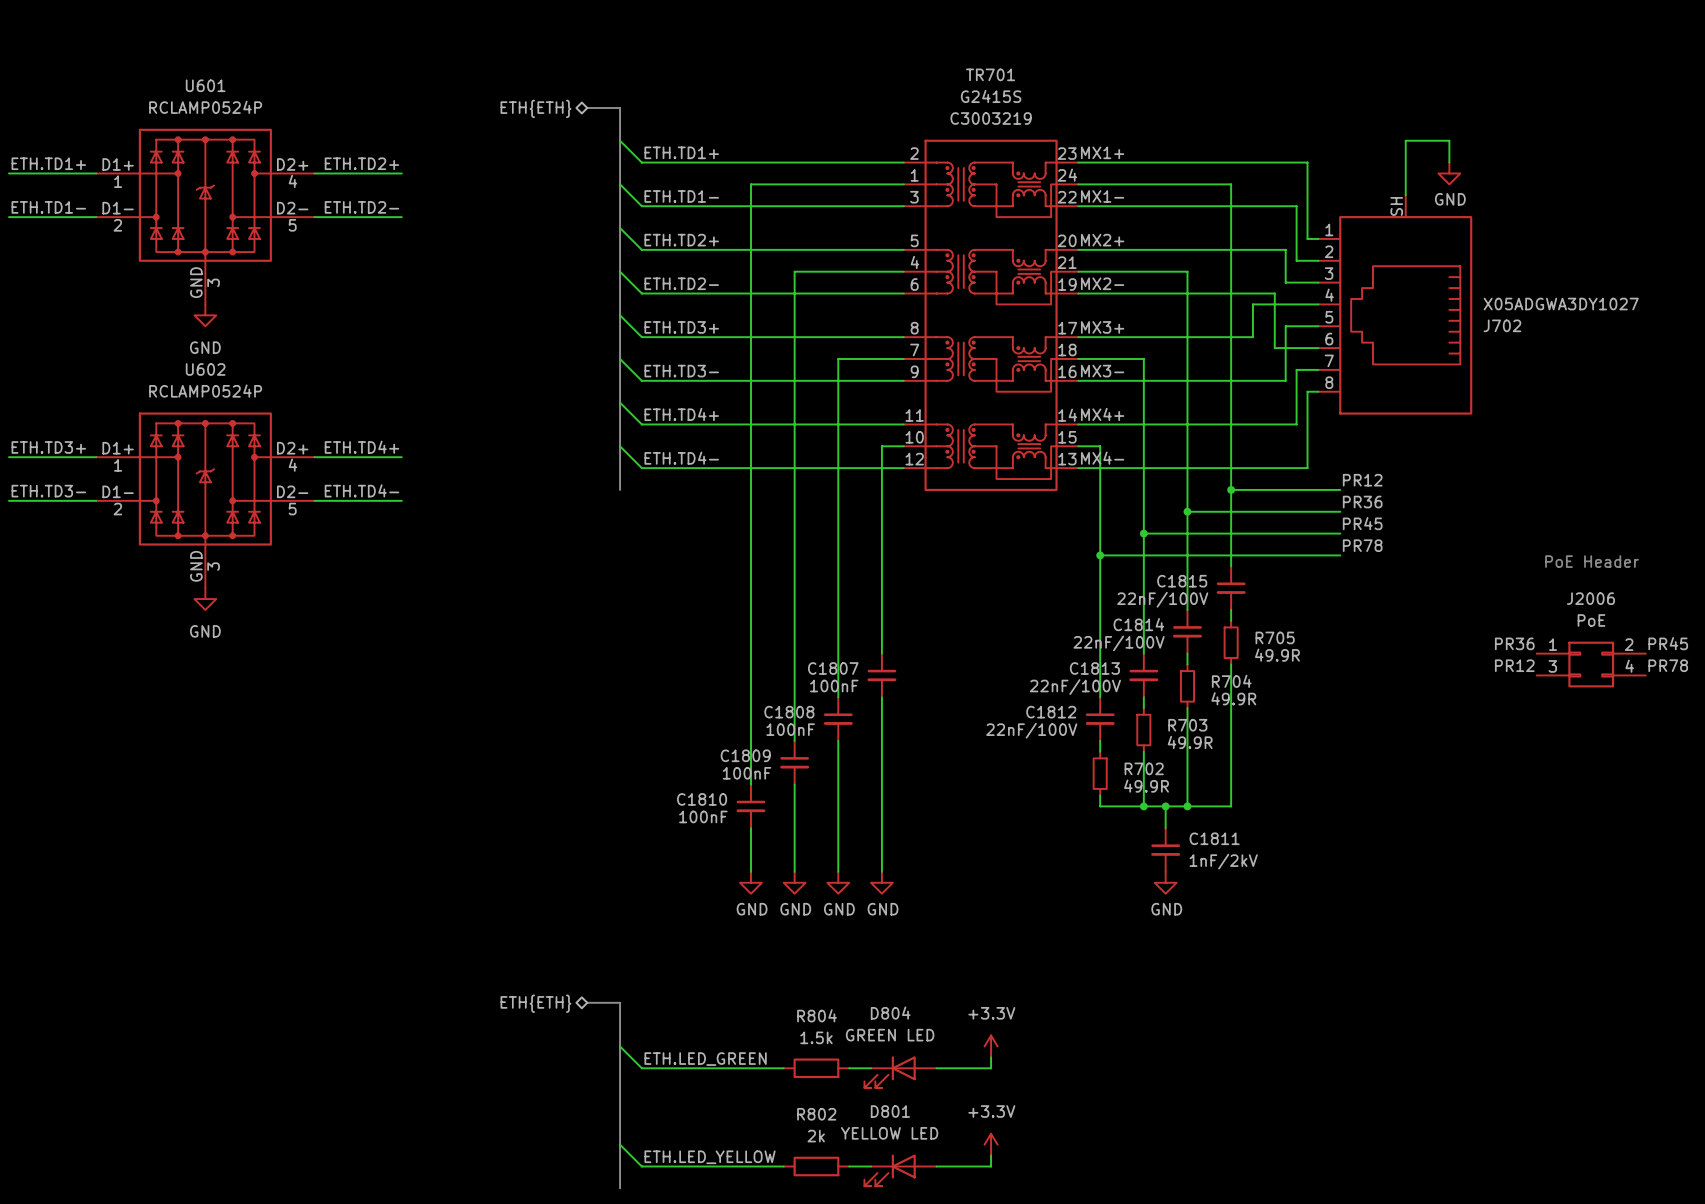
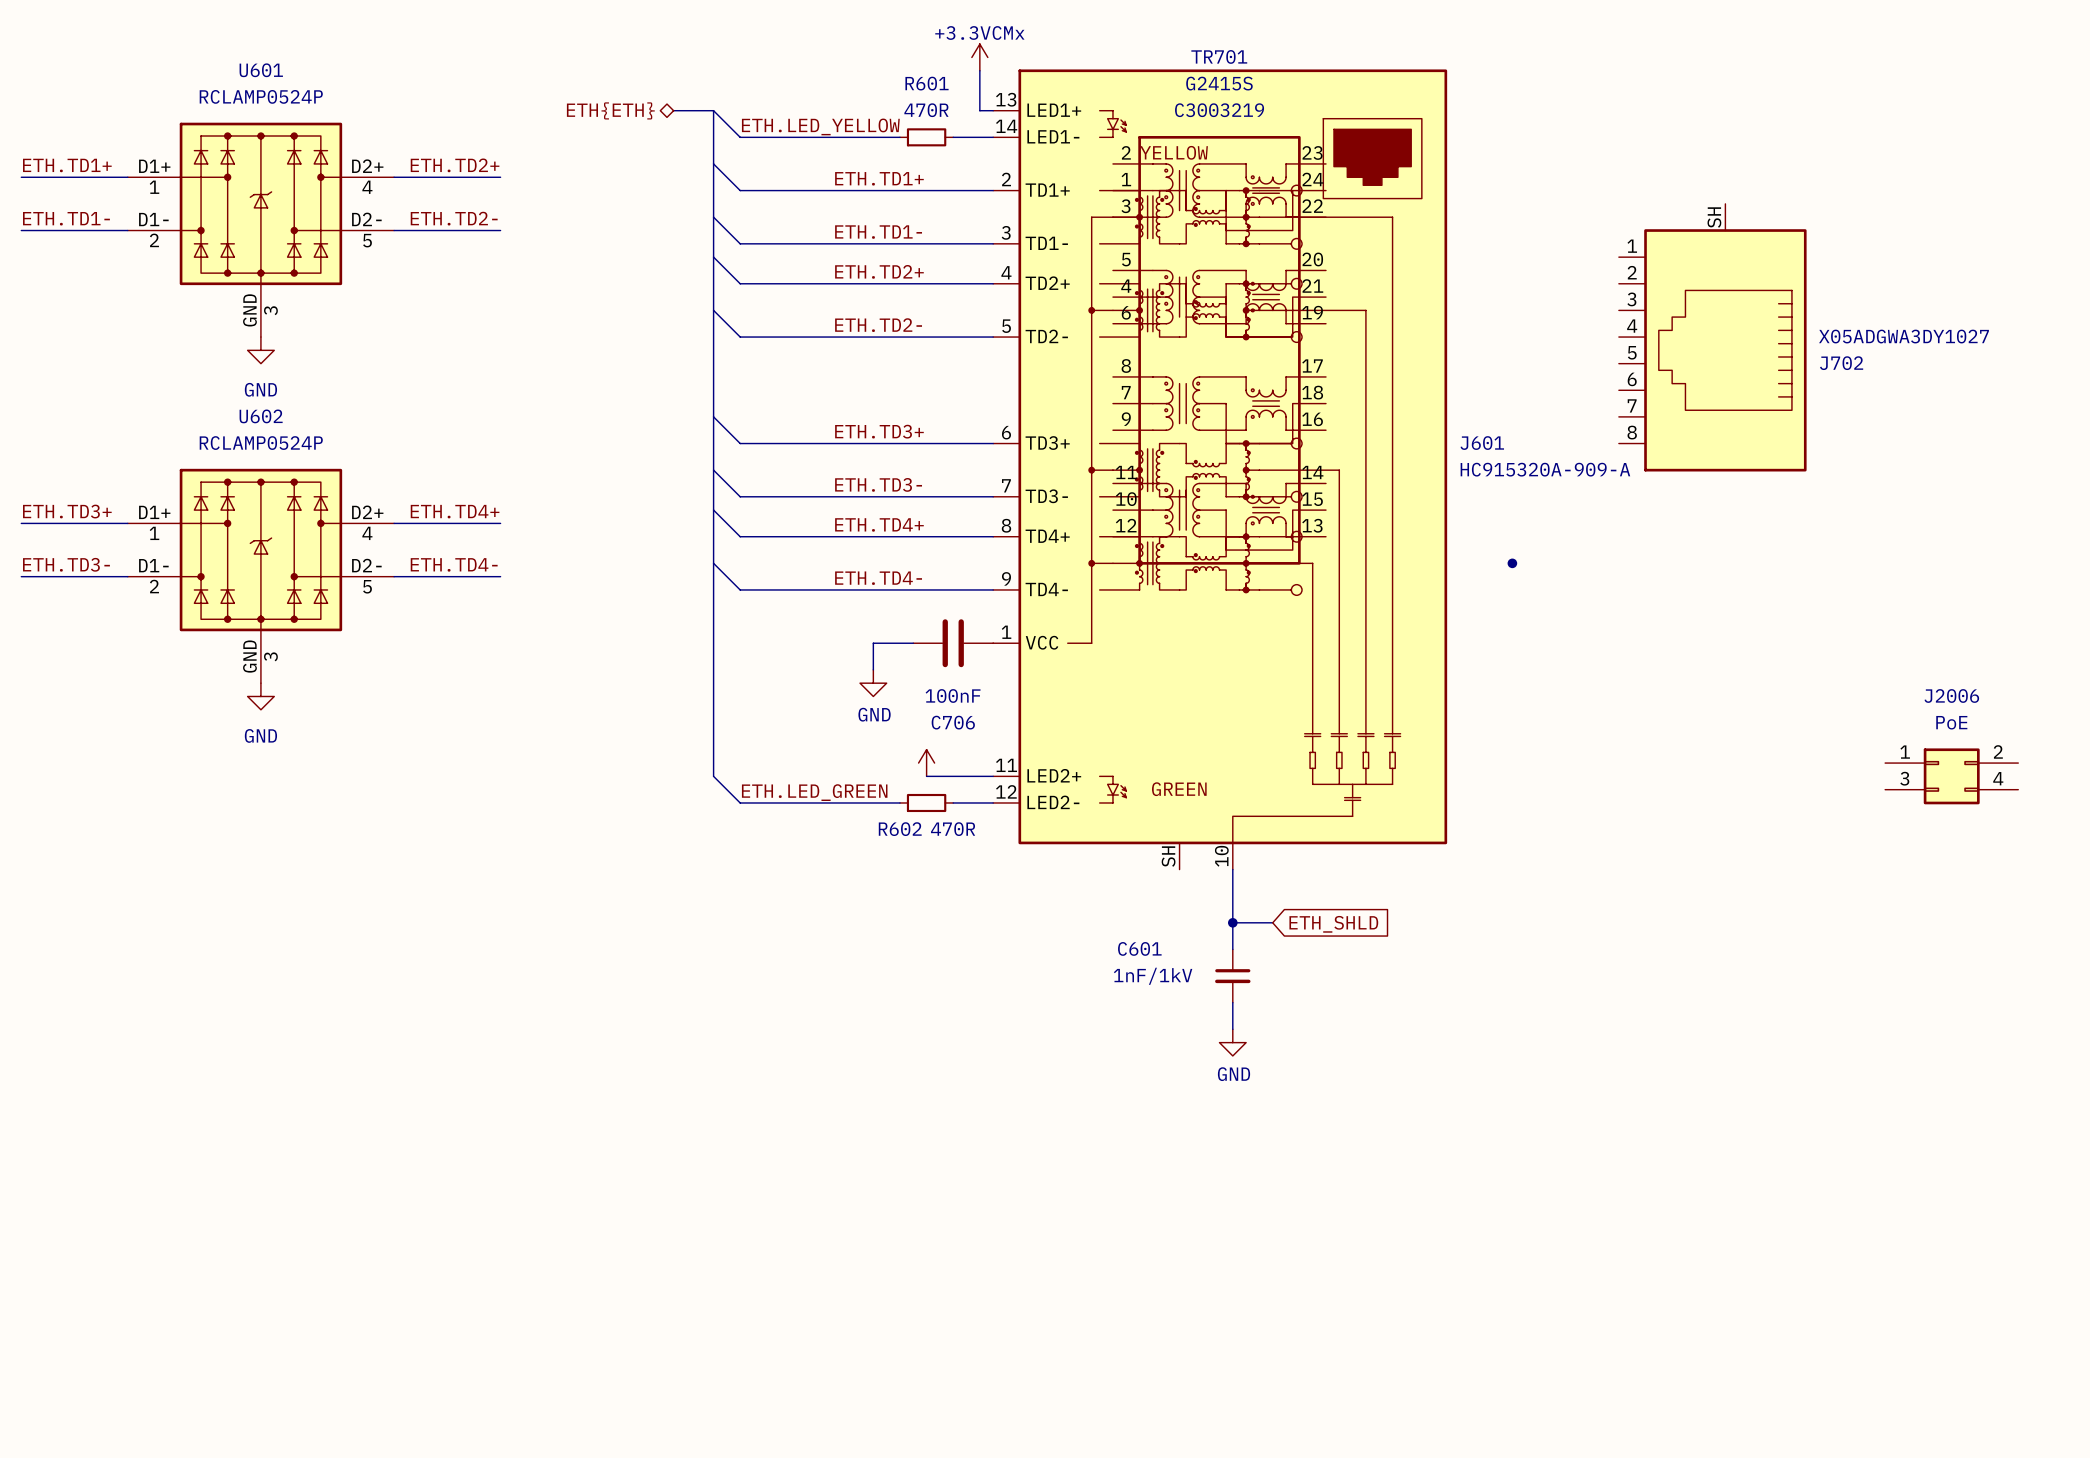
power symbol: none -> +3.3VCMx (979, 57)
wire: none -> (979, 70) (979, 110) (993, 110)
hierarchical label position: ETH{ETH} (535, 108) -> ETH{ETH} (610, 110)
bus: (587, 108) (620, 108) (620, 489) -> none
bus: none -> (673, 110) (713, 110) (713, 776)
wire: none -> (713, 110) (740, 137) (899, 137)
label: none -> ETH.LED_YELLOW (820, 126)
wire: (620, 140) (641, 162) (903, 162) -> none
R601: none -> 470R (926, 137)
wire: none -> (953, 137) (993, 137)
label position: ETH.TD1+ (681, 152) -> ETH.TD1+ (879, 178)
label: MX1+ (1102, 152) -> none
wire: (1078, 162) (1307, 162) (1307, 238) (1318, 238) -> none
wire: (1449, 162) (1449, 140) (1405, 140) (1405, 195) -> none
power symbol: GND (1449, 173) -> none
wire: (620, 184) (641, 206) (903, 206) -> none
wire: (750, 184) (750, 784) -> (926, 190) (740, 190) (713, 163)
wire: (1078, 184) (1231, 184) (1231, 566) -> none
label position: ETH.TD1- (681, 196) -> ETH.TD1- (878, 232)
label: MX1- (1102, 196) -> none
wire: none -> (713, 217) (740, 243) (993, 243)
wire: (1078, 206) (1296, 206) (1296, 260) (1318, 260) -> none
wire: (620, 228) (641, 249) (903, 249) -> none
wire: none -> (713, 257) (740, 283) (993, 283)
label position: ETH.TD2+ (681, 240) -> ETH.TD2+ (879, 271)
label: MX2+ (1102, 240) -> none
wire: (1078, 249) (1285, 249) (1285, 282) (1318, 282) -> none
wire: (620, 271) (641, 293) (903, 293) -> none
wire: (903, 271) (794, 271) (794, 740) -> none
wire: (1078, 271) (1187, 271) (1187, 609) -> none
wire: none -> (713, 310) (740, 337) (993, 337)
label position: ETH.TD2- (681, 283) -> ETH.TD2- (878, 325)
label: MX2- (1102, 283) -> none
wire: (1078, 293) (1274, 293) (1274, 348) (1318, 348) -> none
wire: (1318, 304) (1252, 304) (1252, 337) (1078, 337) -> none
wire: (620, 315) (641, 337) (903, 337) -> none
wire: (1318, 326) (1285, 326) (1285, 380) (1078, 380) -> none
label position: ETH.TD3+ (681, 327) -> ETH.TD3+ (879, 431)
label: MX3+ (1102, 327) -> none
wire: (620, 358) (641, 380) (903, 380) -> none
wire: none -> (713, 416) (740, 443) (993, 443)
wire: (1318, 369) (1296, 369) (1296, 424) (1078, 424) -> none
label position: ETH.TD3- (681, 371) -> ETH.TD3- (878, 484)
label: MX3- (1102, 371) -> none
wire: (1318, 391) (1307, 391) (1307, 468) (1078, 468) -> none
wire: (620, 402) (641, 424) (903, 424) -> none
wire: none -> (713, 470) (740, 496) (993, 496)
J601: none -> HC915320A-909-A (1220, 469)
label position: ETH.TD4+ (681, 414) -> ETH.TD4+ (879, 524)
label: MX4+ (1102, 414) -> none
wire: (620, 446) (641, 468) -> (713, 510) (740, 536) (793, 536)
label position: ETH.TD4- (681, 458) -> ETH.TD4- (878, 578)
label: MX4- (1102, 458) -> none
label: PR12 (1362, 480) -> none
wire: none -> (713, 563) (740, 589) (993, 589)
wire: (1231, 489) (1340, 489) -> none
label: PR36 (1362, 502) -> none
wire: (1187, 511) (1340, 511) -> none
junction: (1187, 511) -> none
label: PR45 (1362, 523) -> none
wire: (1143, 533) (1340, 533) -> none
junction: (1143, 533) -> none
label: PR78 (1362, 545) -> none
wire: none -> (913, 643) (873, 643) (873, 669)
C706: none -> 100nF (953, 643)
wire: (1100, 555) (1340, 555) -> none
junction: (1100, 555) -> none
text: PoE Header (1592, 561) -> none
power symbol: none -> GND (873, 683)
C1815: 22nF/100V (1231, 588) -> none
wire: (1231, 609) (1231, 620) -> none
C1814: 22nF/100V (1187, 631) -> none
R705: 49.9R (1231, 642) -> none
label: PR36 (1514, 643) -> none
label: PR45 (1668, 643) -> none
power symbol: none -> (926, 763)
wire: (1187, 653) (1187, 664) -> none
wire: none -> (713, 776) (740, 802) (899, 802)
wire: none -> (926, 776) (993, 776)
wire: (1231, 664) (1231, 806) (1100, 806) (1100, 795) -> none
label: PR12 (1514, 665) -> none
label: PR78 (1668, 665) -> none
C1807: 100nF (881, 675) -> none
C1813: 22nF/100V (1143, 675) -> none
label: none -> ETH.LED_GREEN (814, 792)
R602: none -> 470R (926, 802)
wire: none -> (953, 802) (993, 802)
R704: 49.9R (1187, 686) -> none
wire: (881, 697) (881, 871) -> none
wire: (1187, 708) (1187, 806) -> none
C1808: 100nF (838, 719) -> none
C1812: 22nF/100V (1100, 719) -> none
R703: 49.9R (1143, 730) -> none
wire: (838, 740) (838, 871) -> none
wire: none -> (1232, 869) (1232, 949)
wire: (1100, 740) (1100, 751) -> none
wire: (1143, 751) (1143, 806) -> none
C1809: 100nF (794, 762) -> none
R702: 49.9R (1100, 773) -> none
wire: (794, 784) (794, 871) -> none
wire: none -> (1232, 922) (1272, 922)
junction: none -> (1232, 922)
global label: none -> ETH_SHLD (1333, 924)
C1810: 100nF (750, 806) -> none
junction: (1143, 806) -> none
wire: (1165, 806) (1165, 828) -> (1232, 1002) (1232, 1029)
junction: (1165, 806) -> none
junction: (1187, 806) -> none
wire: (750, 828) (750, 871) -> none
C601: none -> 1nF/1kV (1232, 976)
C1811: 1nF/2kV (1165, 850) -> none
power symbol: GND (750, 882) -> none
power symbol: GND (794, 882) -> none
power symbol: GND (838, 882) -> none
power symbol: GND (881, 882) -> none
power symbol: none -> GND (1232, 1042)
power symbol: GND (1165, 882) -> none
bus: (587, 1002) (620, 1002) (620, 1188) -> none
hierarchical label: ETH{ETH} (535, 1003) -> none
wire: (620, 1046) (641, 1068) (783, 1068) -> none
power symbol: +3.3V (991, 1046) -> none
wire: (991, 1057) (991, 1068) (936, 1068) -> none
label: ETH.LED_GREEN (705, 1059) -> none
R804: 1.5k (816, 1068) -> none
wire: (849, 1068) (871, 1068) -> none
D804: GREEN LED (900, 1072) -> none
wire: (620, 1144) (641, 1166) (783, 1166) -> none
power symbol: +3.3V (991, 1144) -> none
wire: (991, 1155) (991, 1166) (936, 1166) -> none
label: ETH.LED_YELLOW (710, 1157) -> none
R802: 2k (816, 1166) -> none
wire: (849, 1166) (871, 1166) -> none
D801: YELLOW LED (900, 1170) -> none

